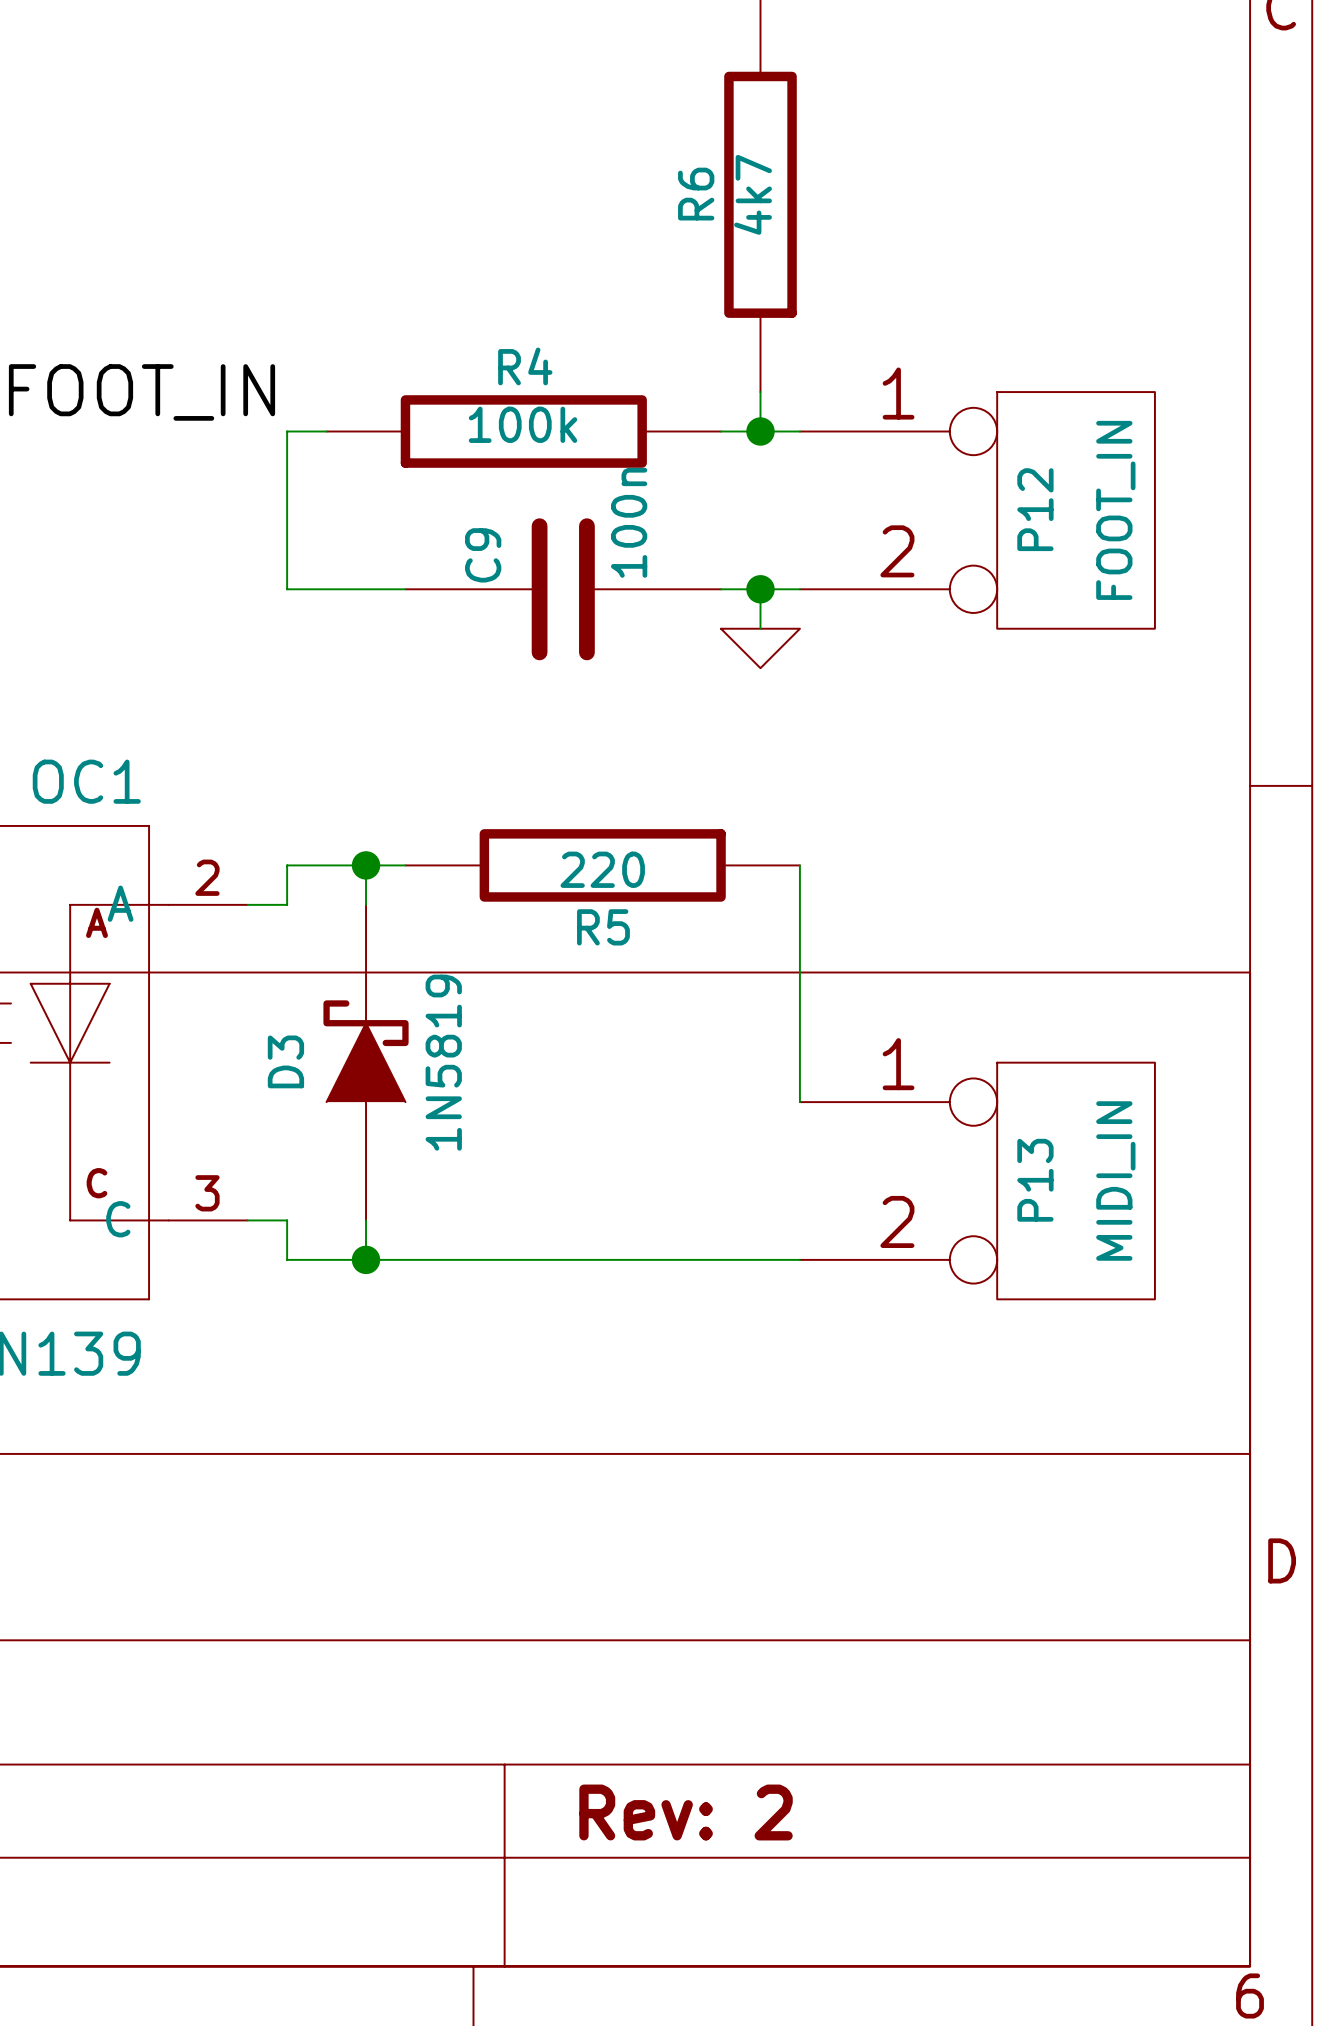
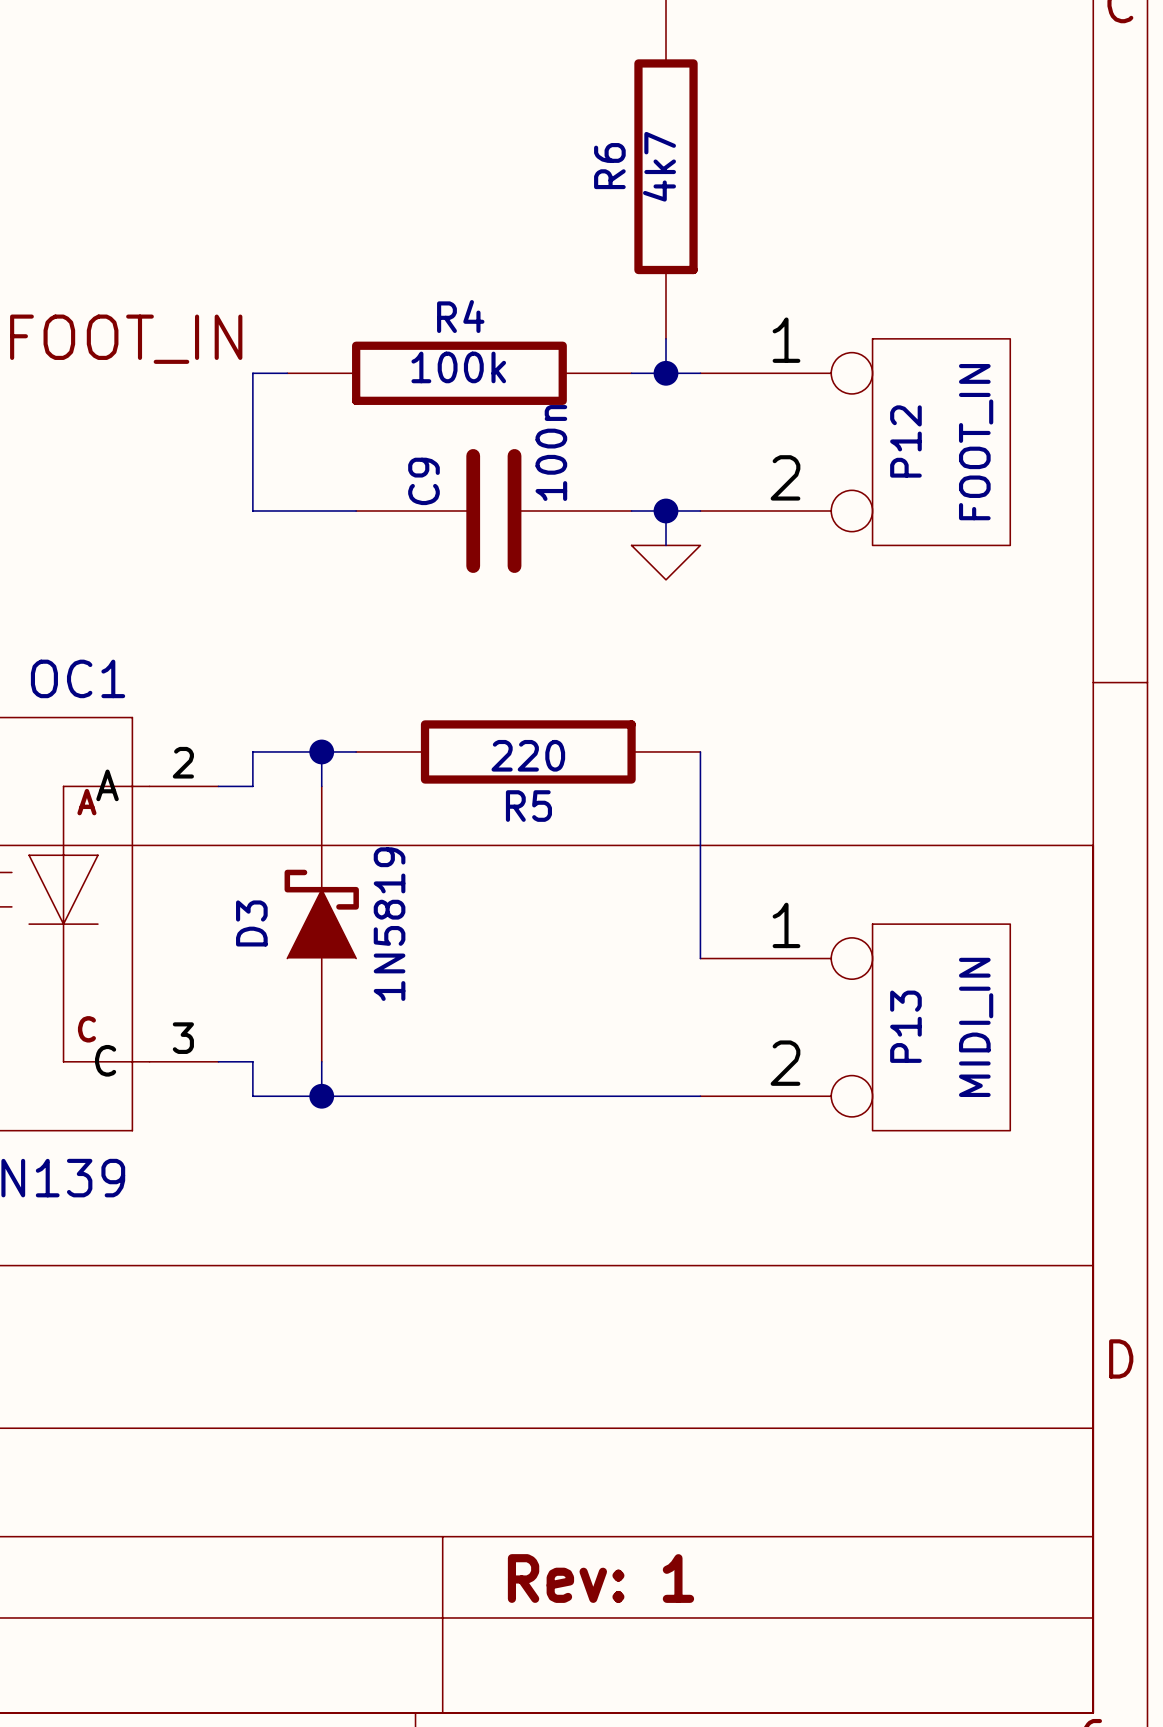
title block: Rev: 2 (686, 1812) -> Rev: 1 (601, 1578)

